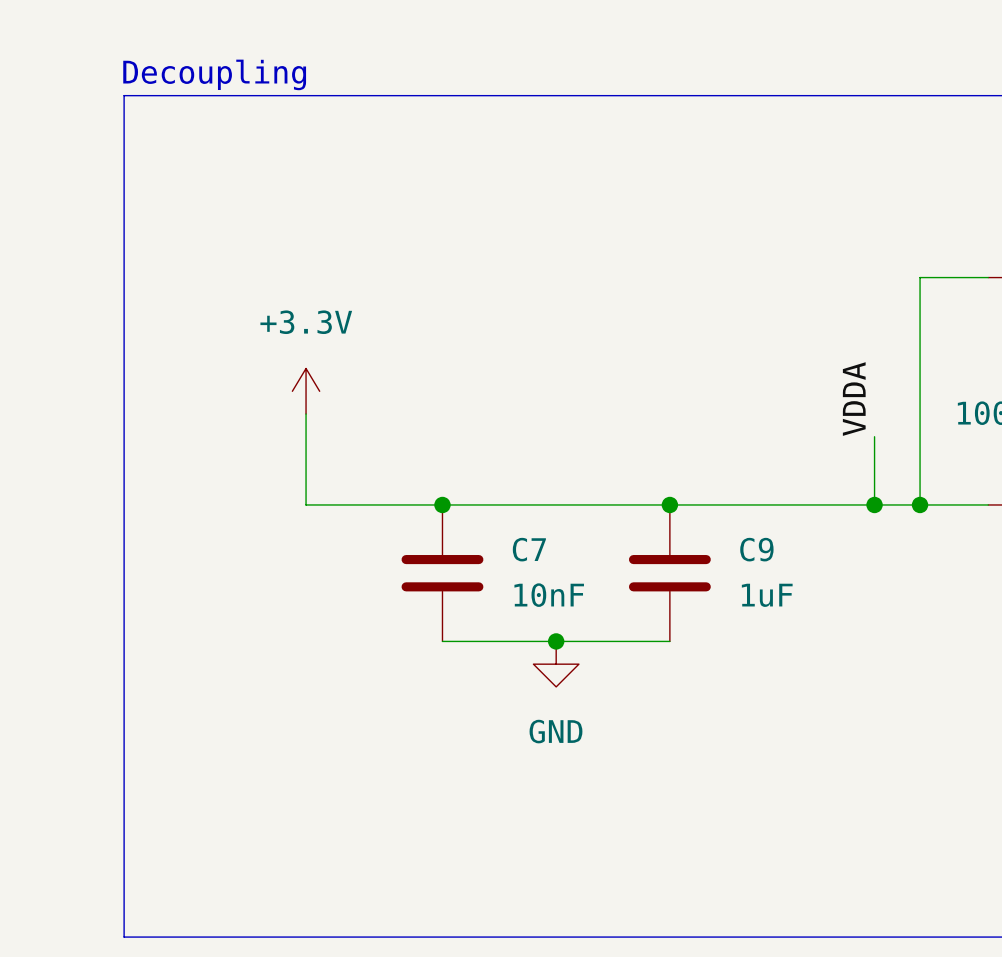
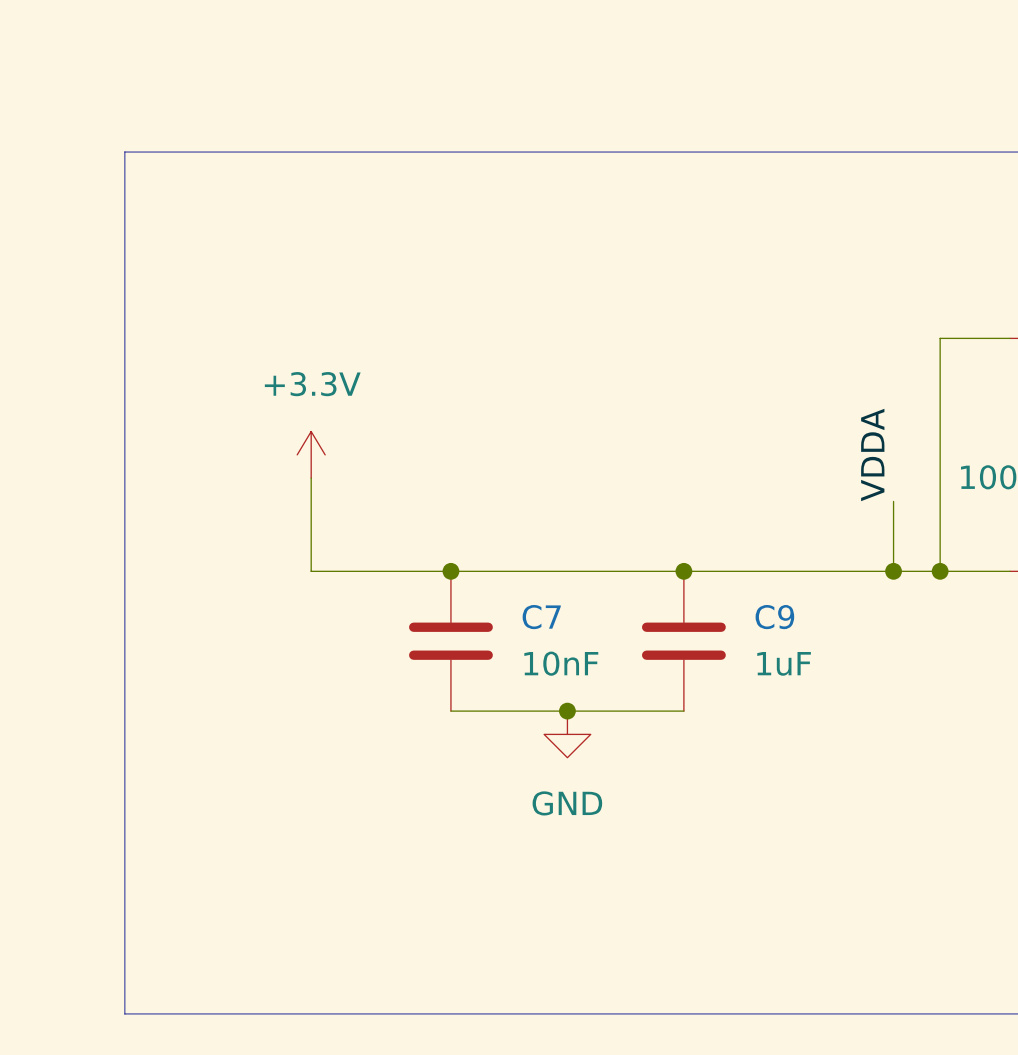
text: Decoupling (214, 74) -> none

